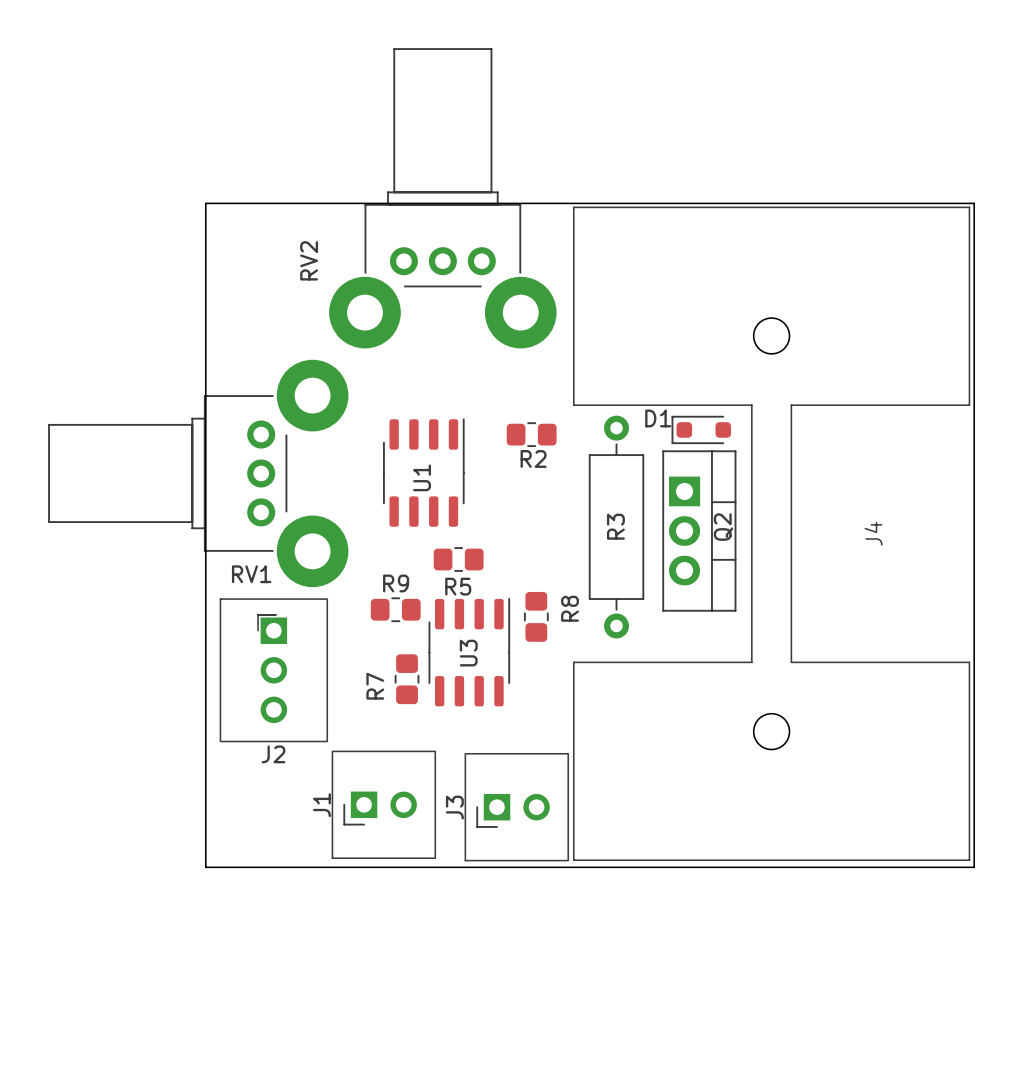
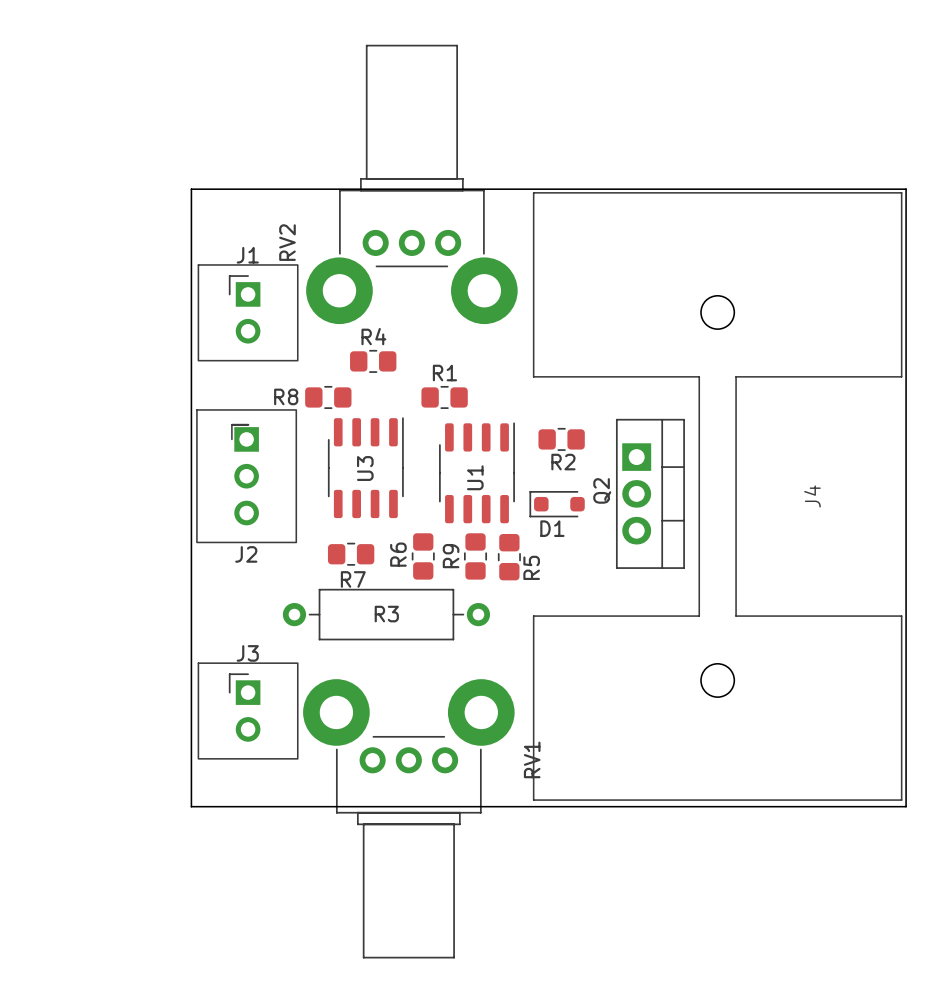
R4: none -> (373, 361)
D1 name position: D1 (658, 418) -> D1 (552, 528)
R1: none -> (444, 397)
D1 position: (701, 429) -> (557, 504)
R2 position: (531, 434) -> (561, 439)
U1 position: (423, 472) -> (476, 472)
RV1 rotation: 0° (198, 473) -> 90° counterclockwise (408, 818)
RV1 position: (198, 473) -> (408, 818)
R3 rotation: 0° (616, 527) -> 90° clockwise (386, 614)
R3 position: (616, 527) -> (386, 614)
Q2 name position: Q2 (723, 527) -> Q2 (602, 490)
R5 rotation: 0° (458, 559) -> 90° clockwise (509, 557)
R5 position: (458, 559) -> (509, 557)
RV1 name position: RV1 (251, 574) -> RV1 (532, 759)
R9 name position: R9 (396, 583) -> R9 (451, 556)
R6: none -> (423, 556)
R8 name position: R8 (570, 608) -> R8 (286, 396)
R9 rotation: 0° (395, 609) -> 90° clockwise (475, 556)
R9 position: (395, 609) -> (475, 556)
R8 rotation: 0° (536, 616) -> 90° clockwise (328, 397)
R8 position: (536, 616) -> (328, 397)
U3 position: (469, 652) -> (365, 467)
J2 position: (273, 670) -> (246, 476)
R7 rotation: 0° (407, 679) -> 90° clockwise (351, 554)
R7 position: (407, 679) -> (351, 554)
R7 name position: R7 (375, 686) -> R7 (353, 579)
J1 rotation: 0° (383, 804) -> 90° clockwise (248, 312)
J1 position: (383, 804) -> (248, 312)
J3 rotation: 0° (516, 807) -> 90° clockwise (248, 711)
J3 position: (516, 807) -> (248, 711)

